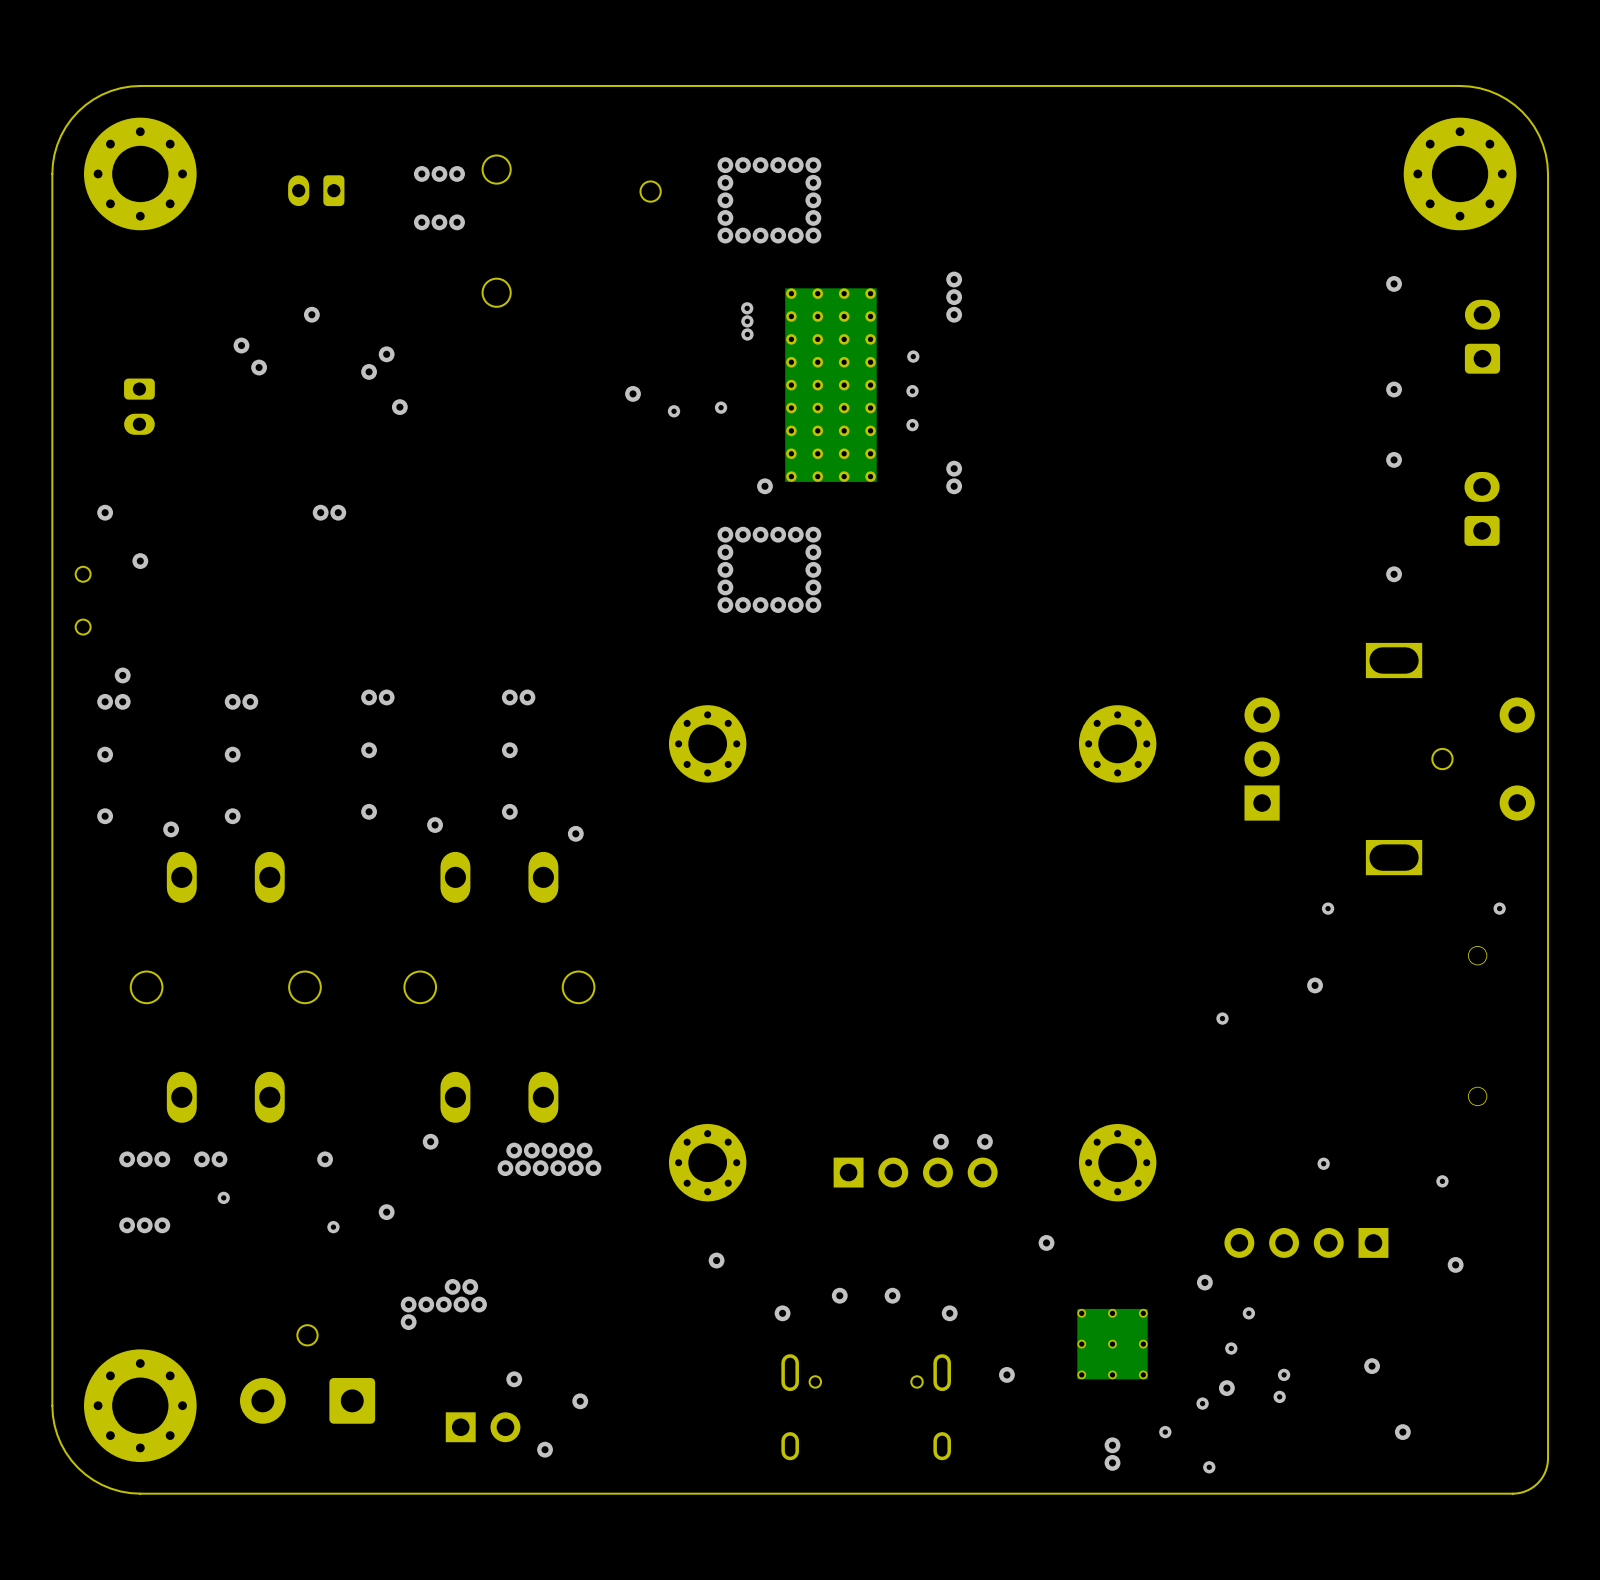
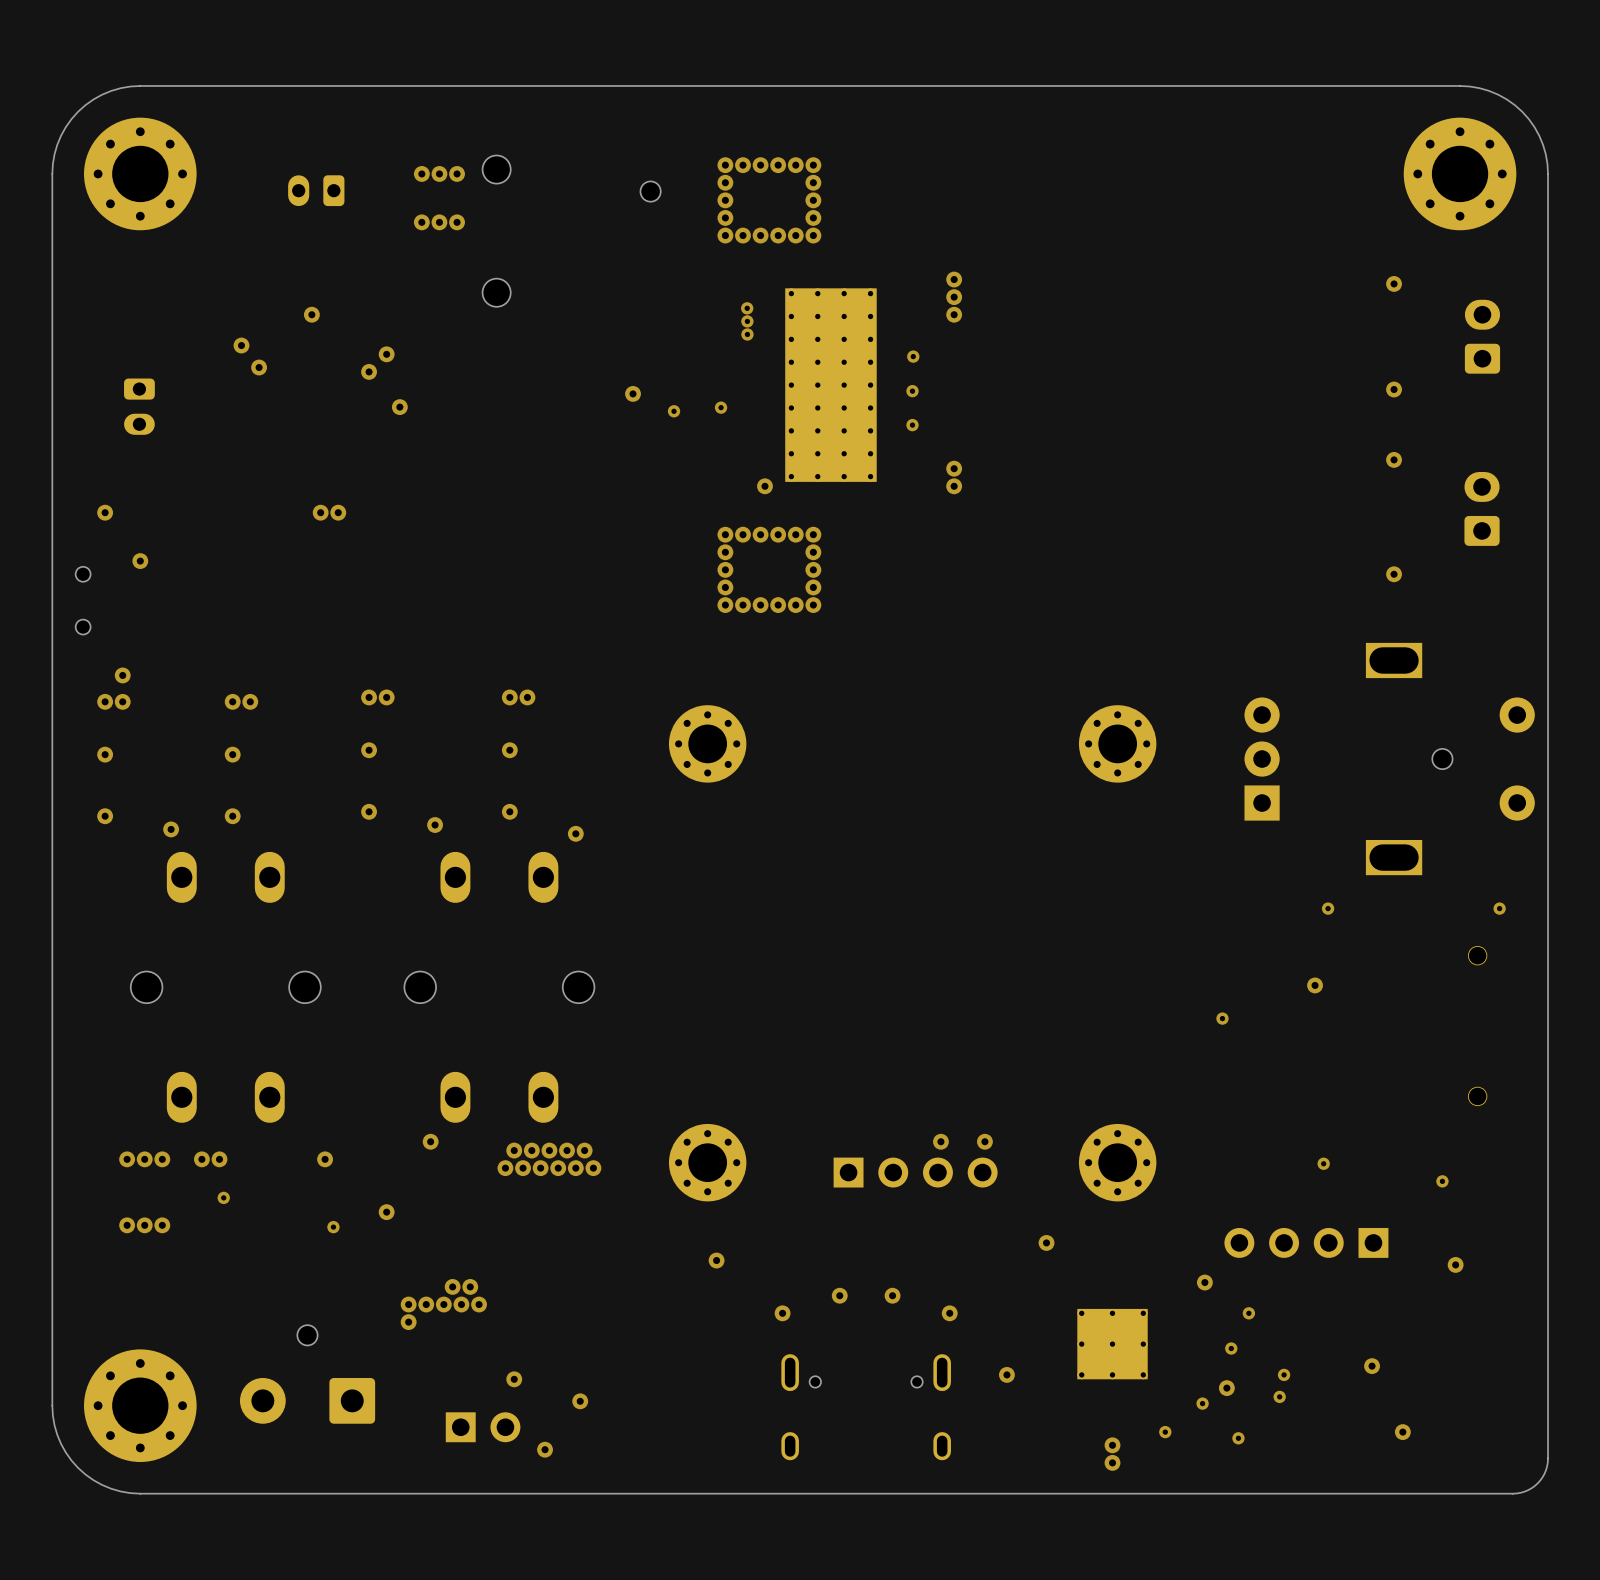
via position: (1209, 1467) -> (1238, 1438)

